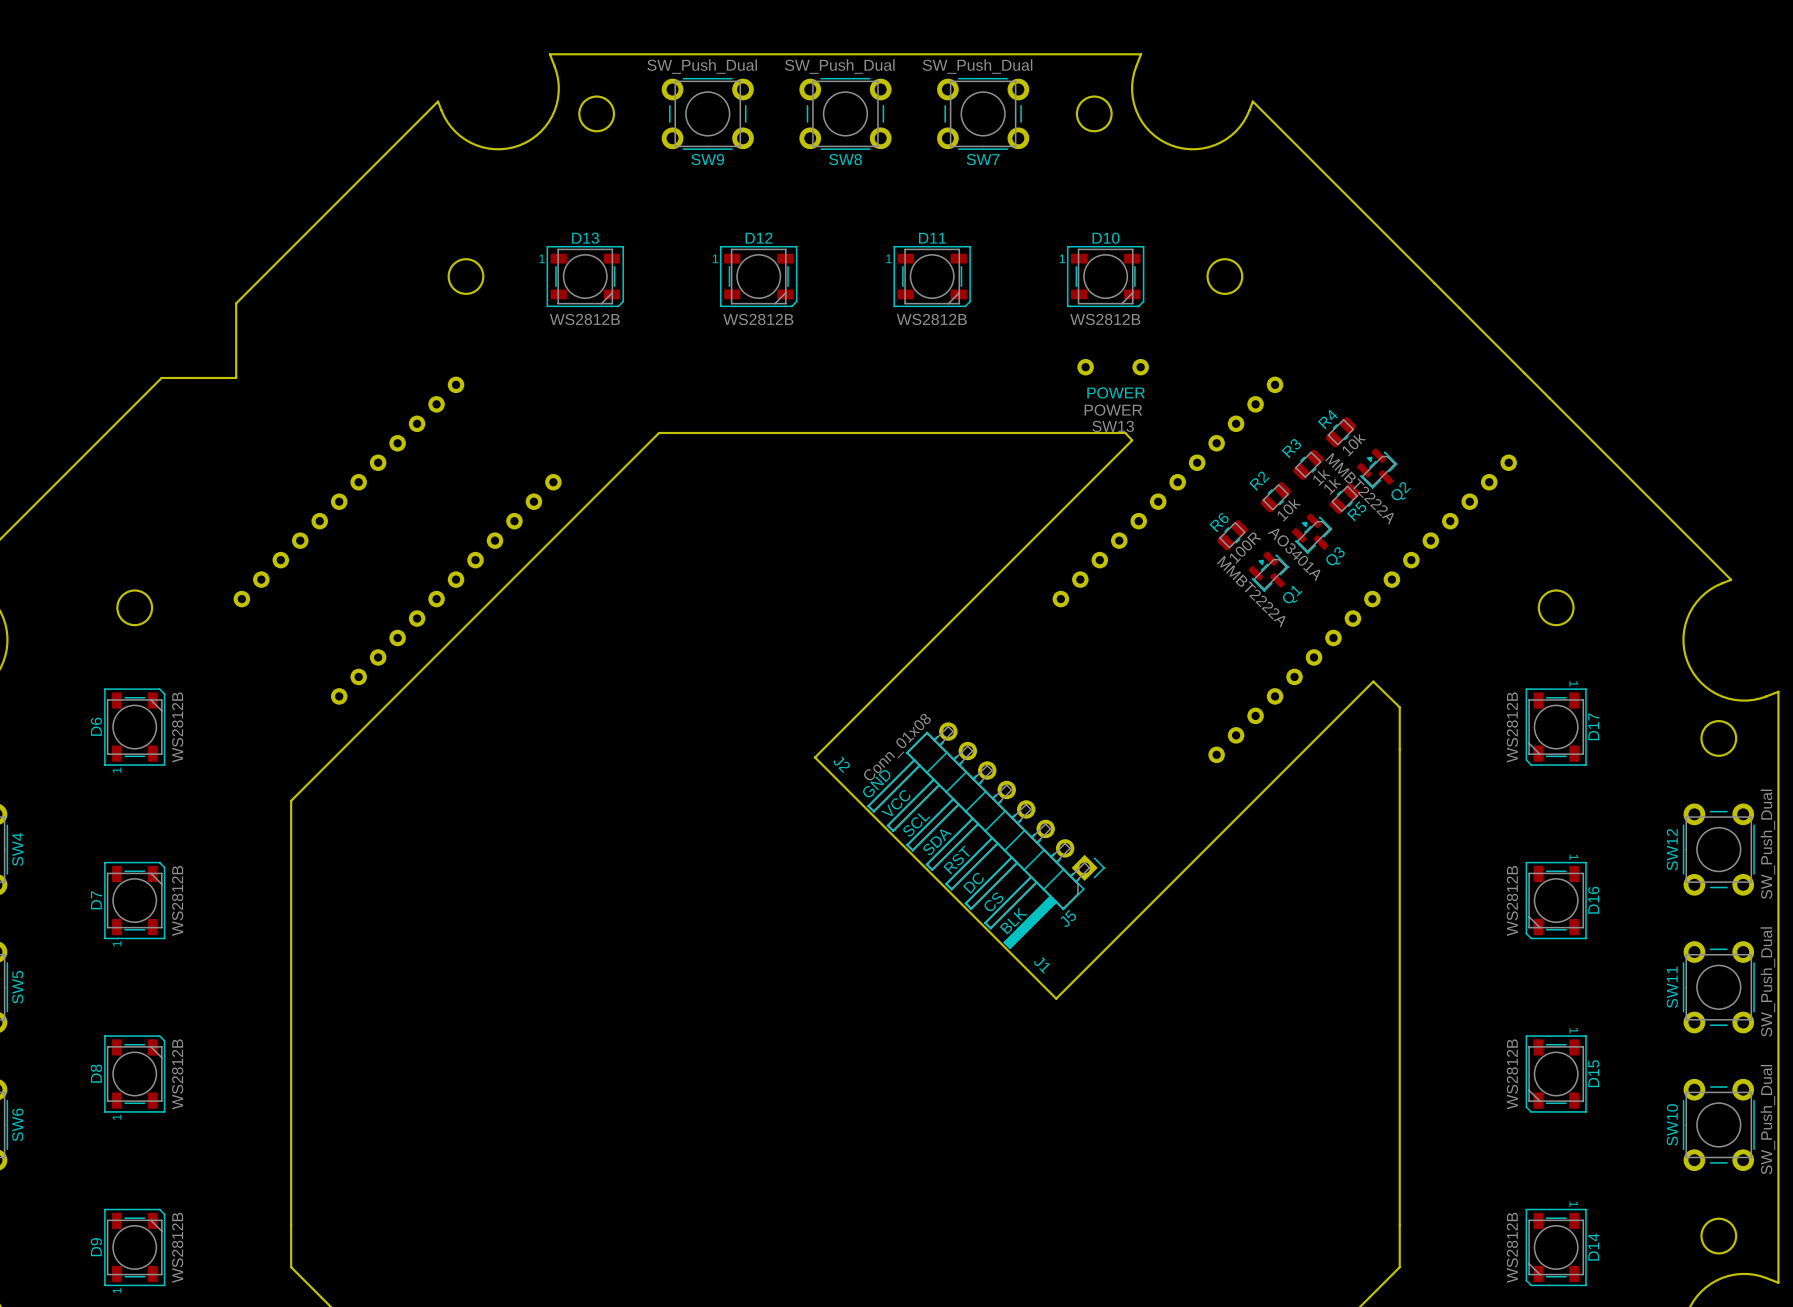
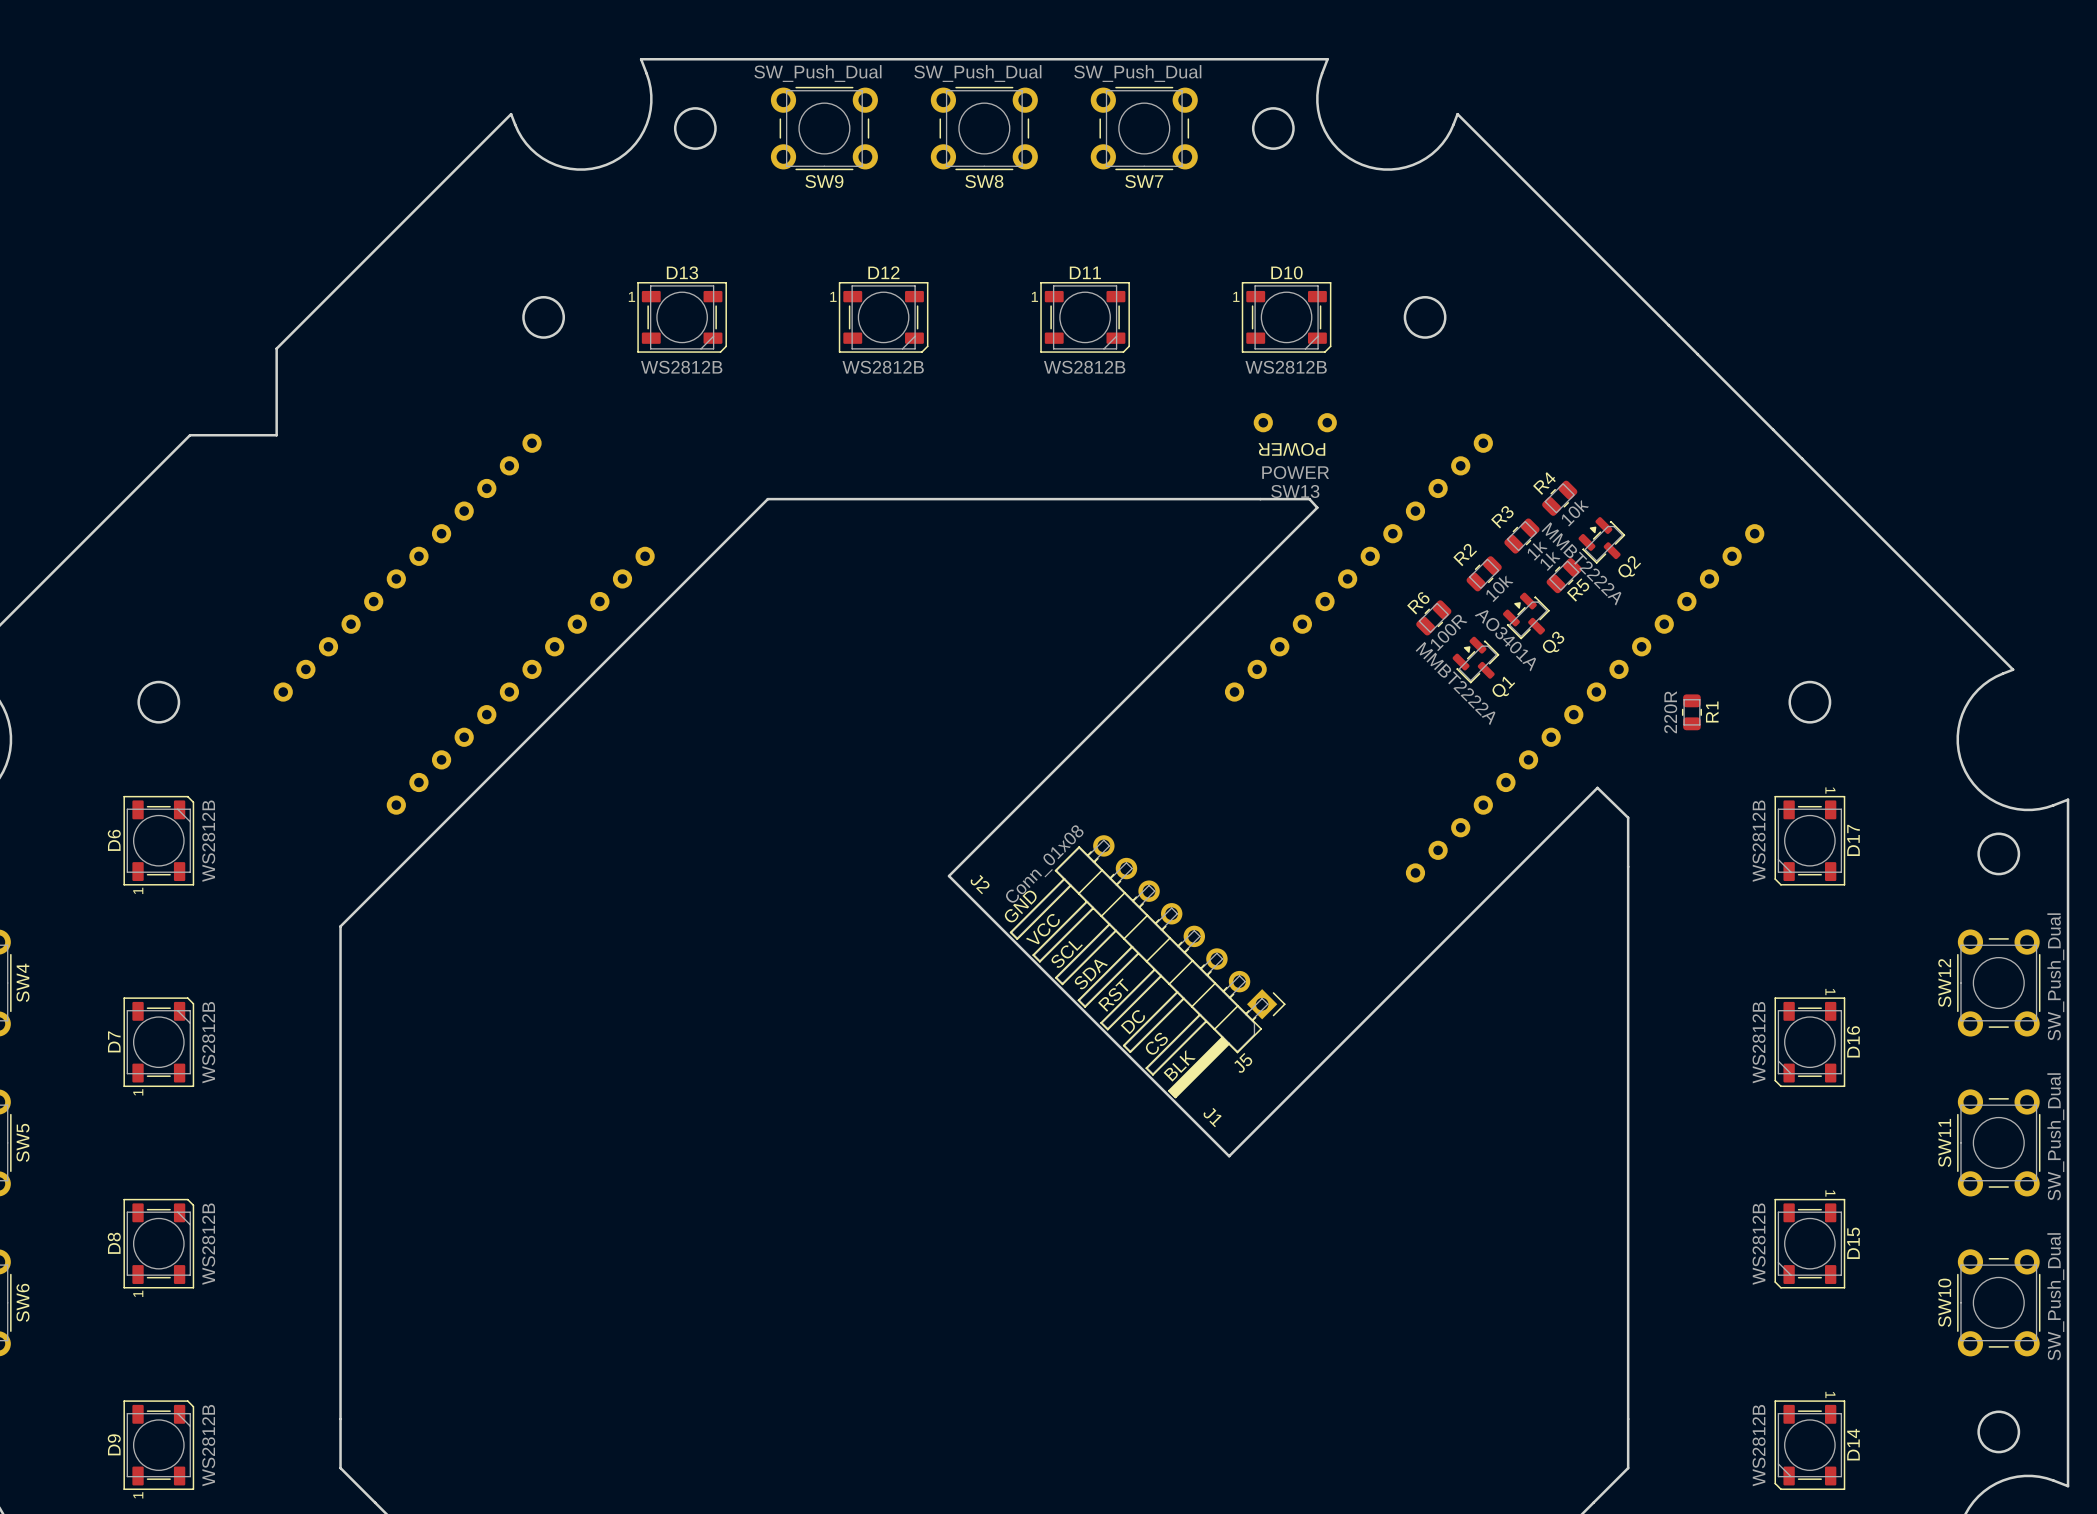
text rotation: 0° (1116, 392) -> 180° (1291, 449)
R1: none -> 220R (1691, 712)

